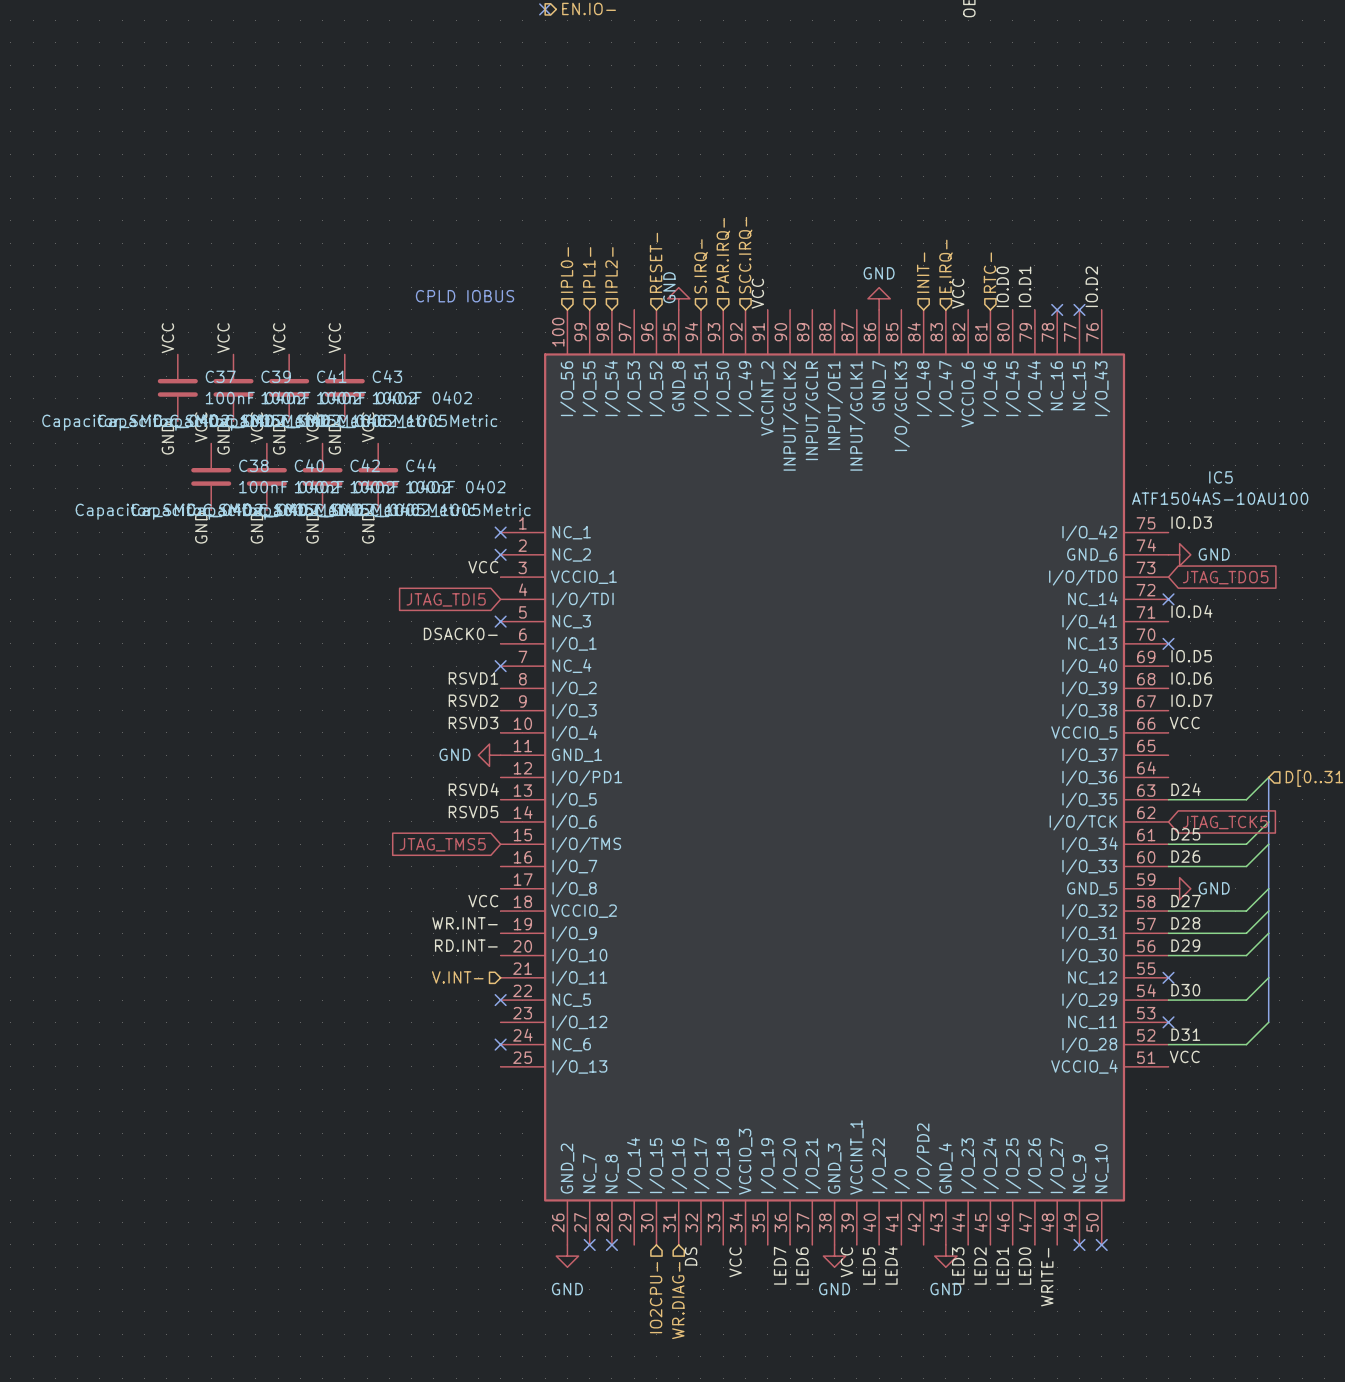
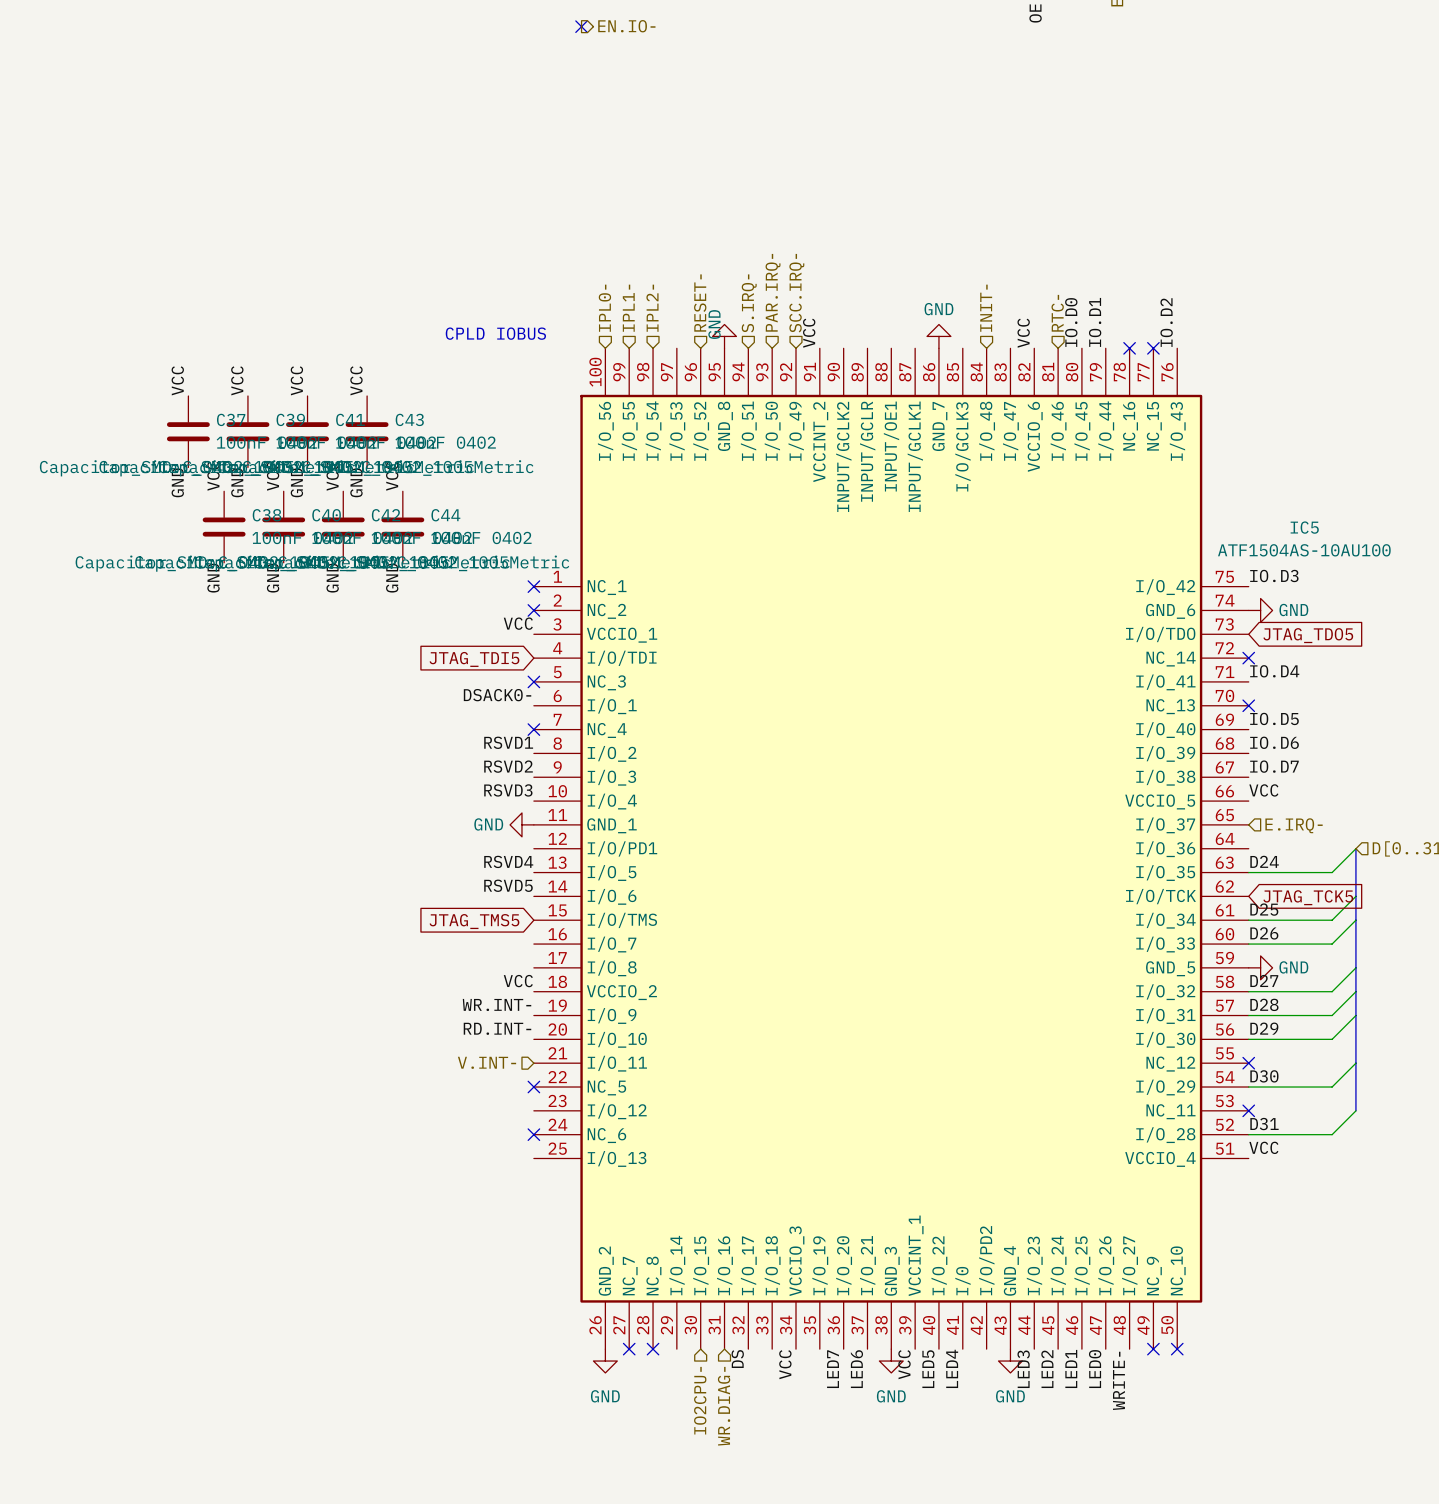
hierarchical label: E.IRQ- (946, 266) -> none
hierarchical label: none -> E.IRQ- (1294, 825)

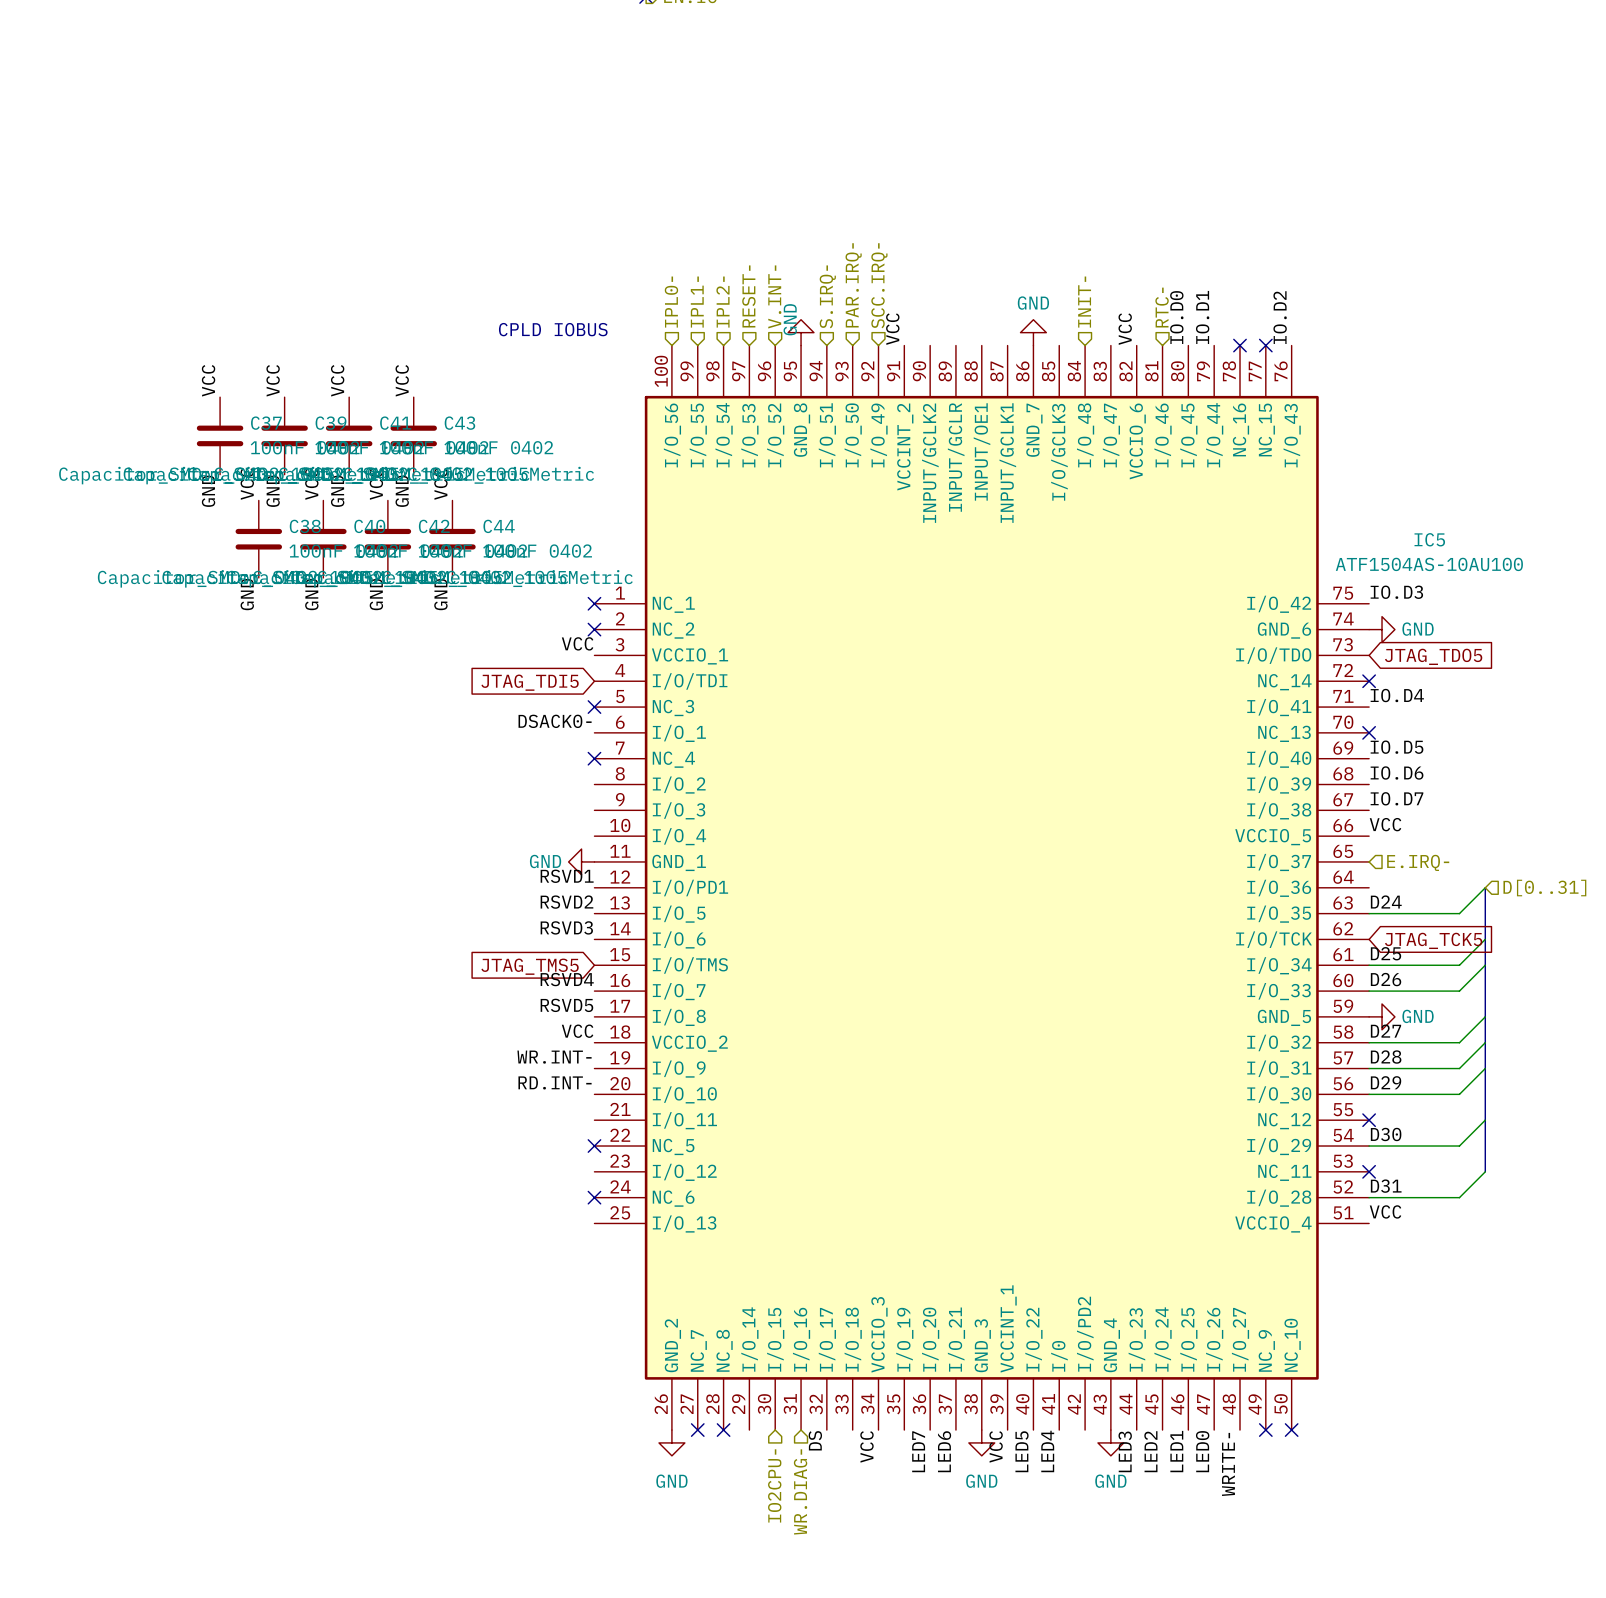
hierarchical label: none -> RESET- (748, 296)
hierarchical label: RESET- (700, 303) -> V.INT- (774, 296)
label position: RSVD1 (508, 742) -> RSVD1 (567, 876)
label: RSVD2 (508, 766) -> none
label: RSVD3 (508, 790) -> none
label: RSVD4 (508, 861) -> RSVD2 (566, 902)
label: RSVD5 (508, 885) -> RSVD3 (566, 927)
label: none -> RSVD4 (567, 979)
label: none -> RSVD5 (566, 1005)
hierarchical label: V.INT- (487, 1062) -> none

